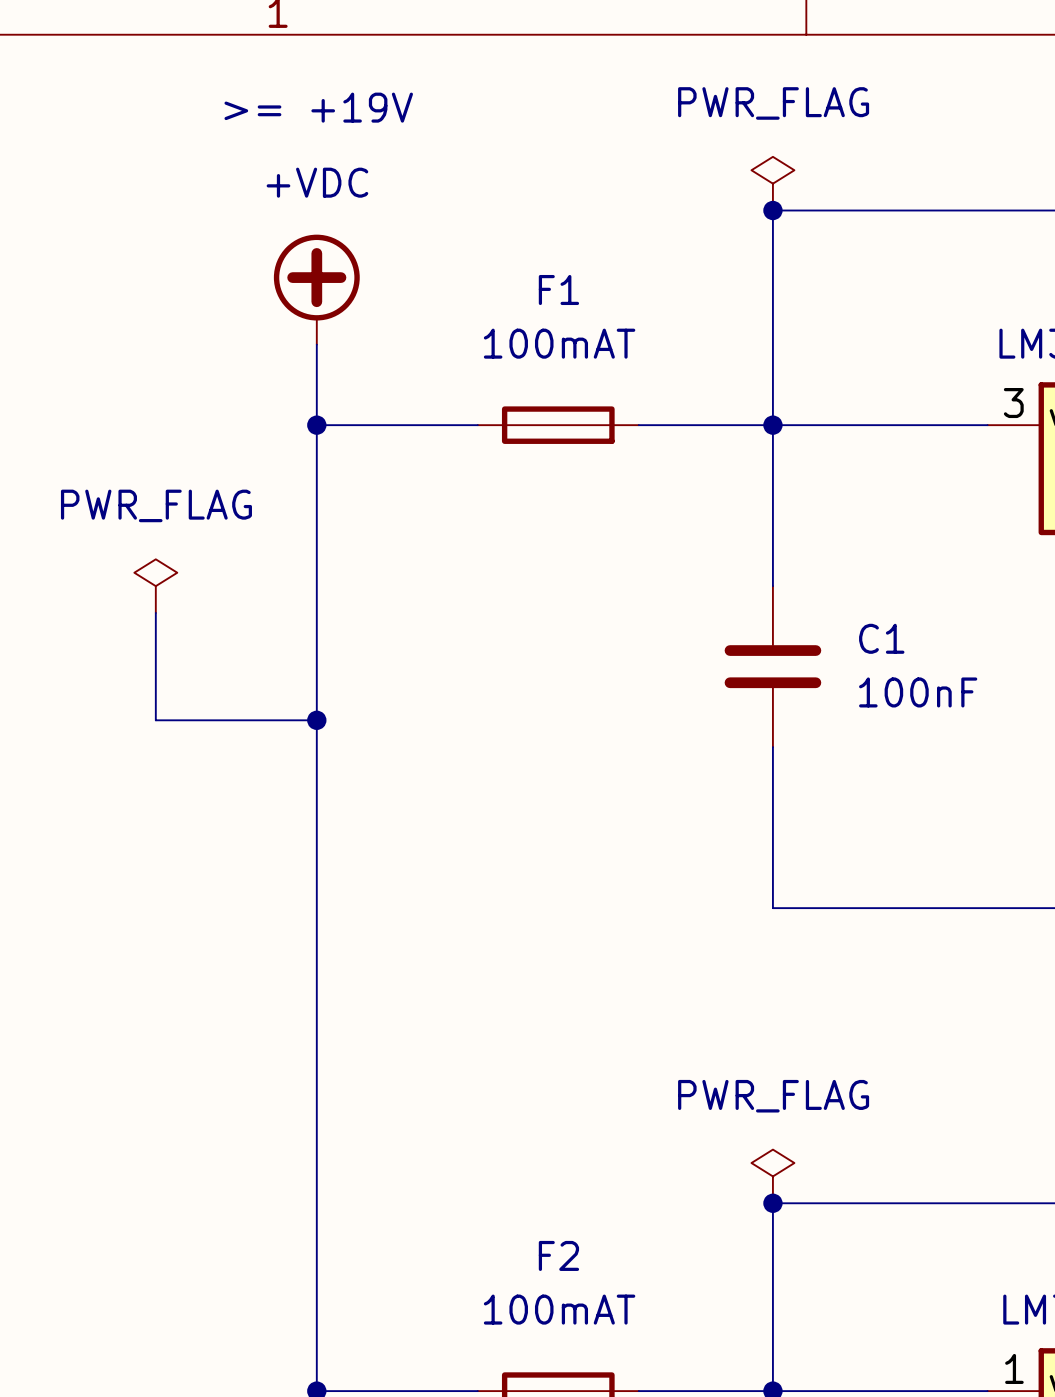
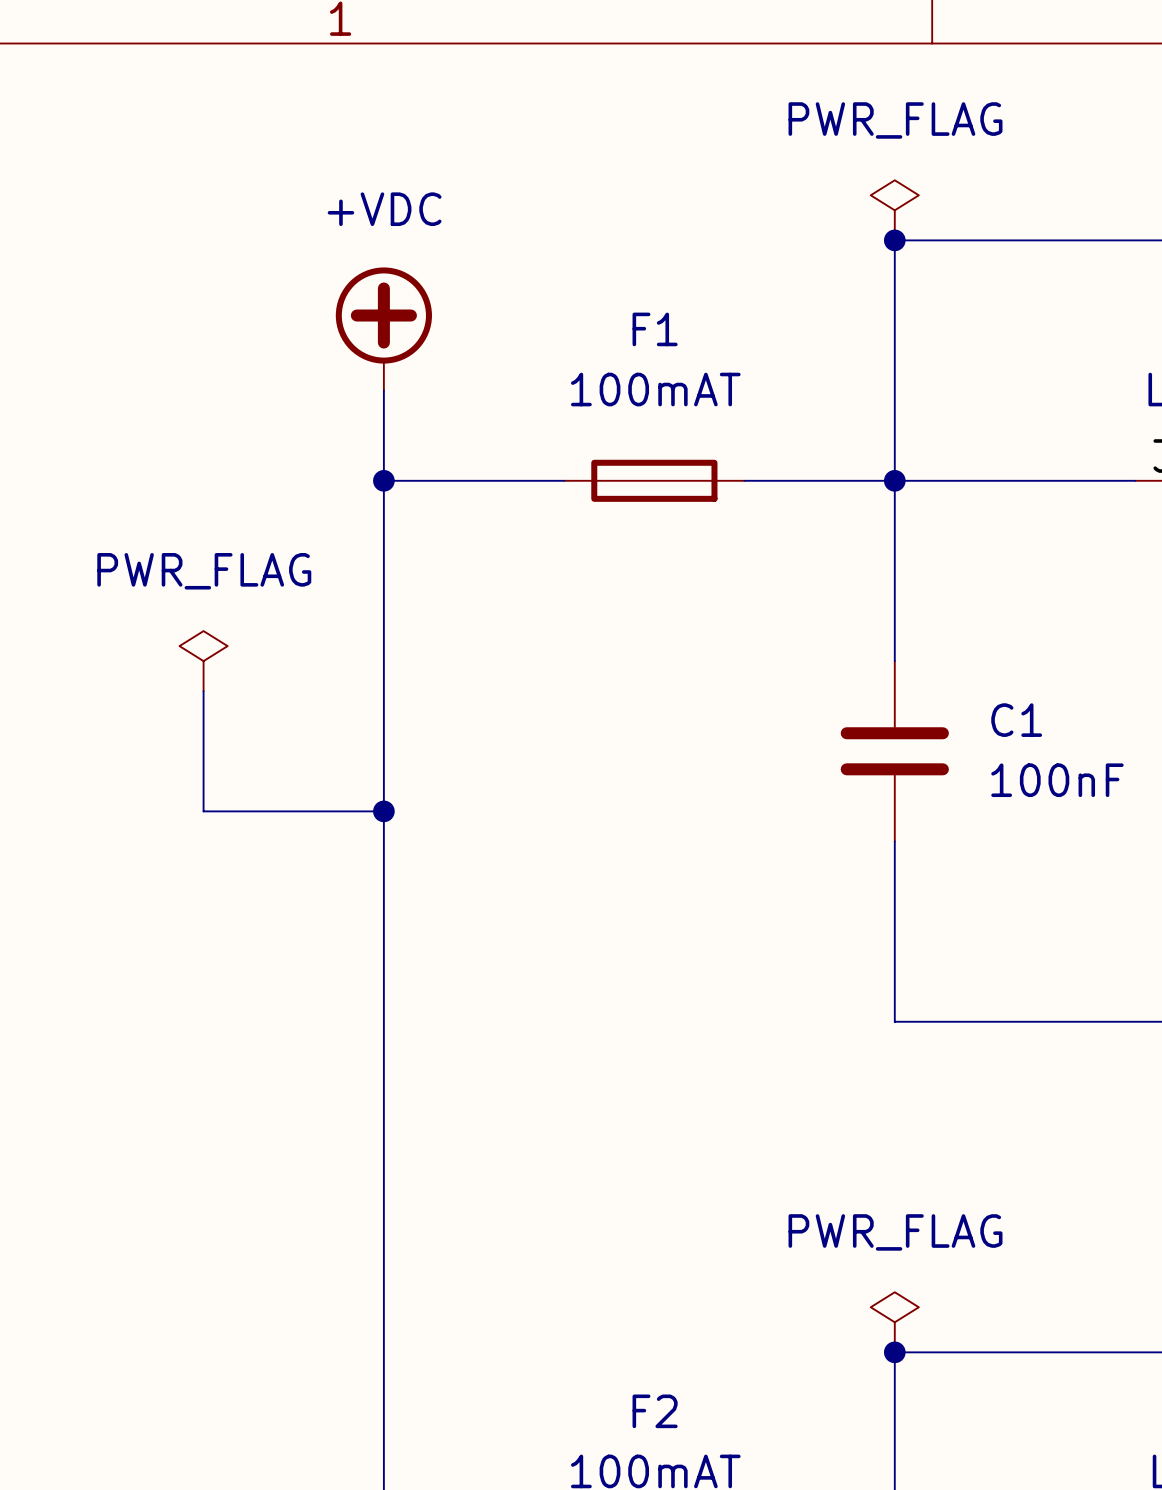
text: >= +19V (318, 107) -> none

